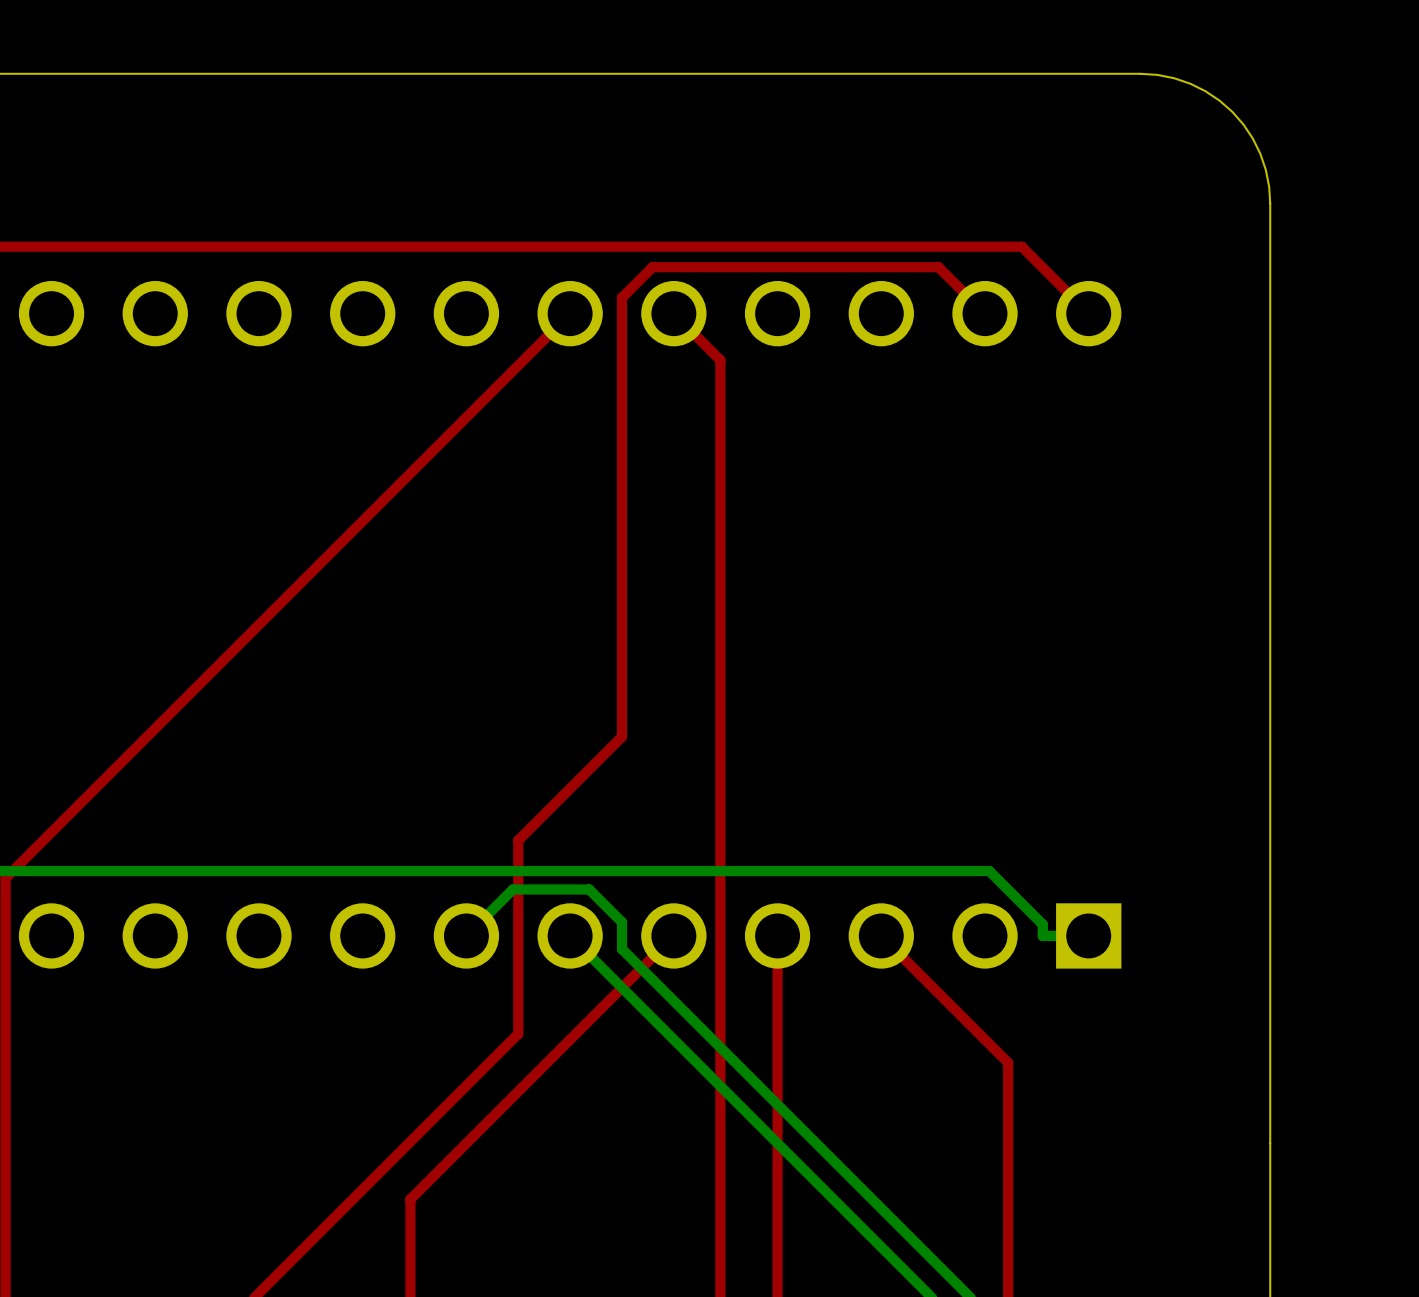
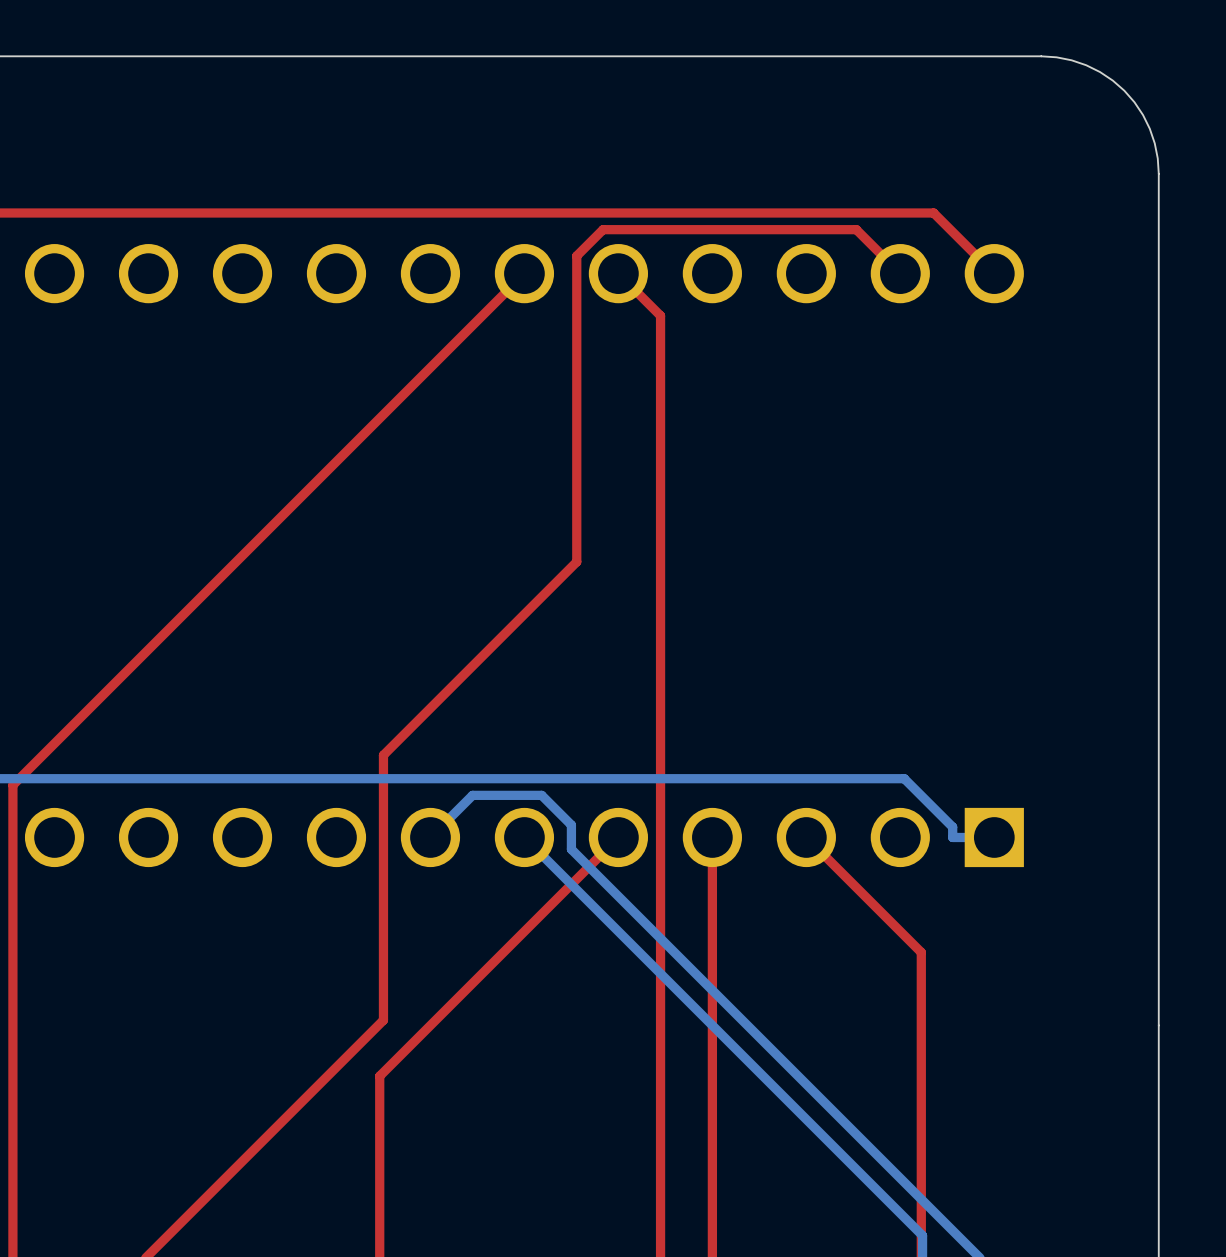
top track: (938, 267) (652, 267) (622, 297) (622, 736) (518, 840) (518, 1033) (414, 1137) -> (858, 231) (856, 229) (603, 229) (576, 255) (576, 561) (383, 755) (383, 1020)

